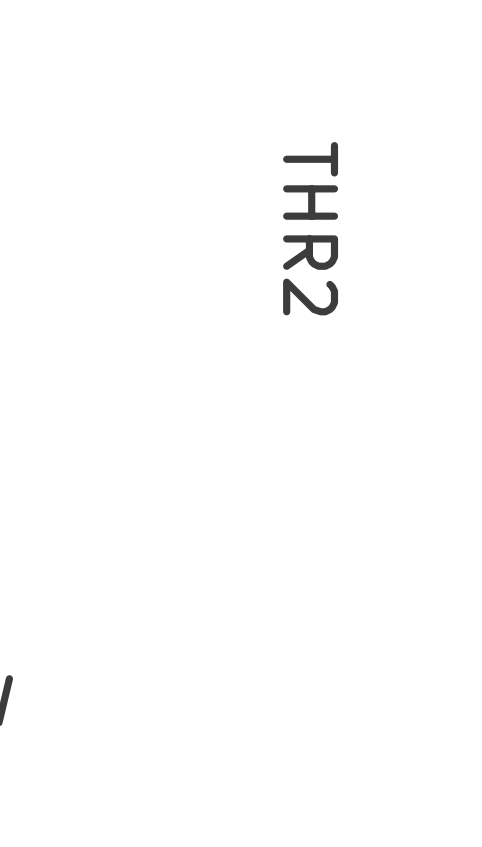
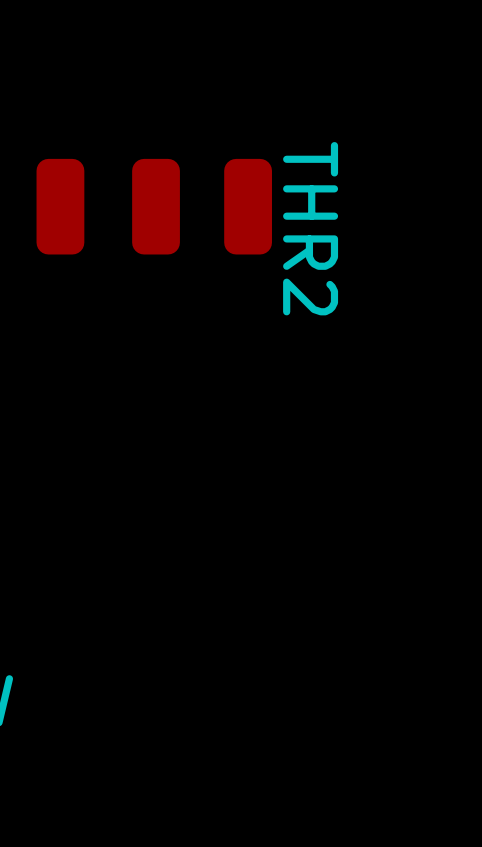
part: none -> (154, 206)

